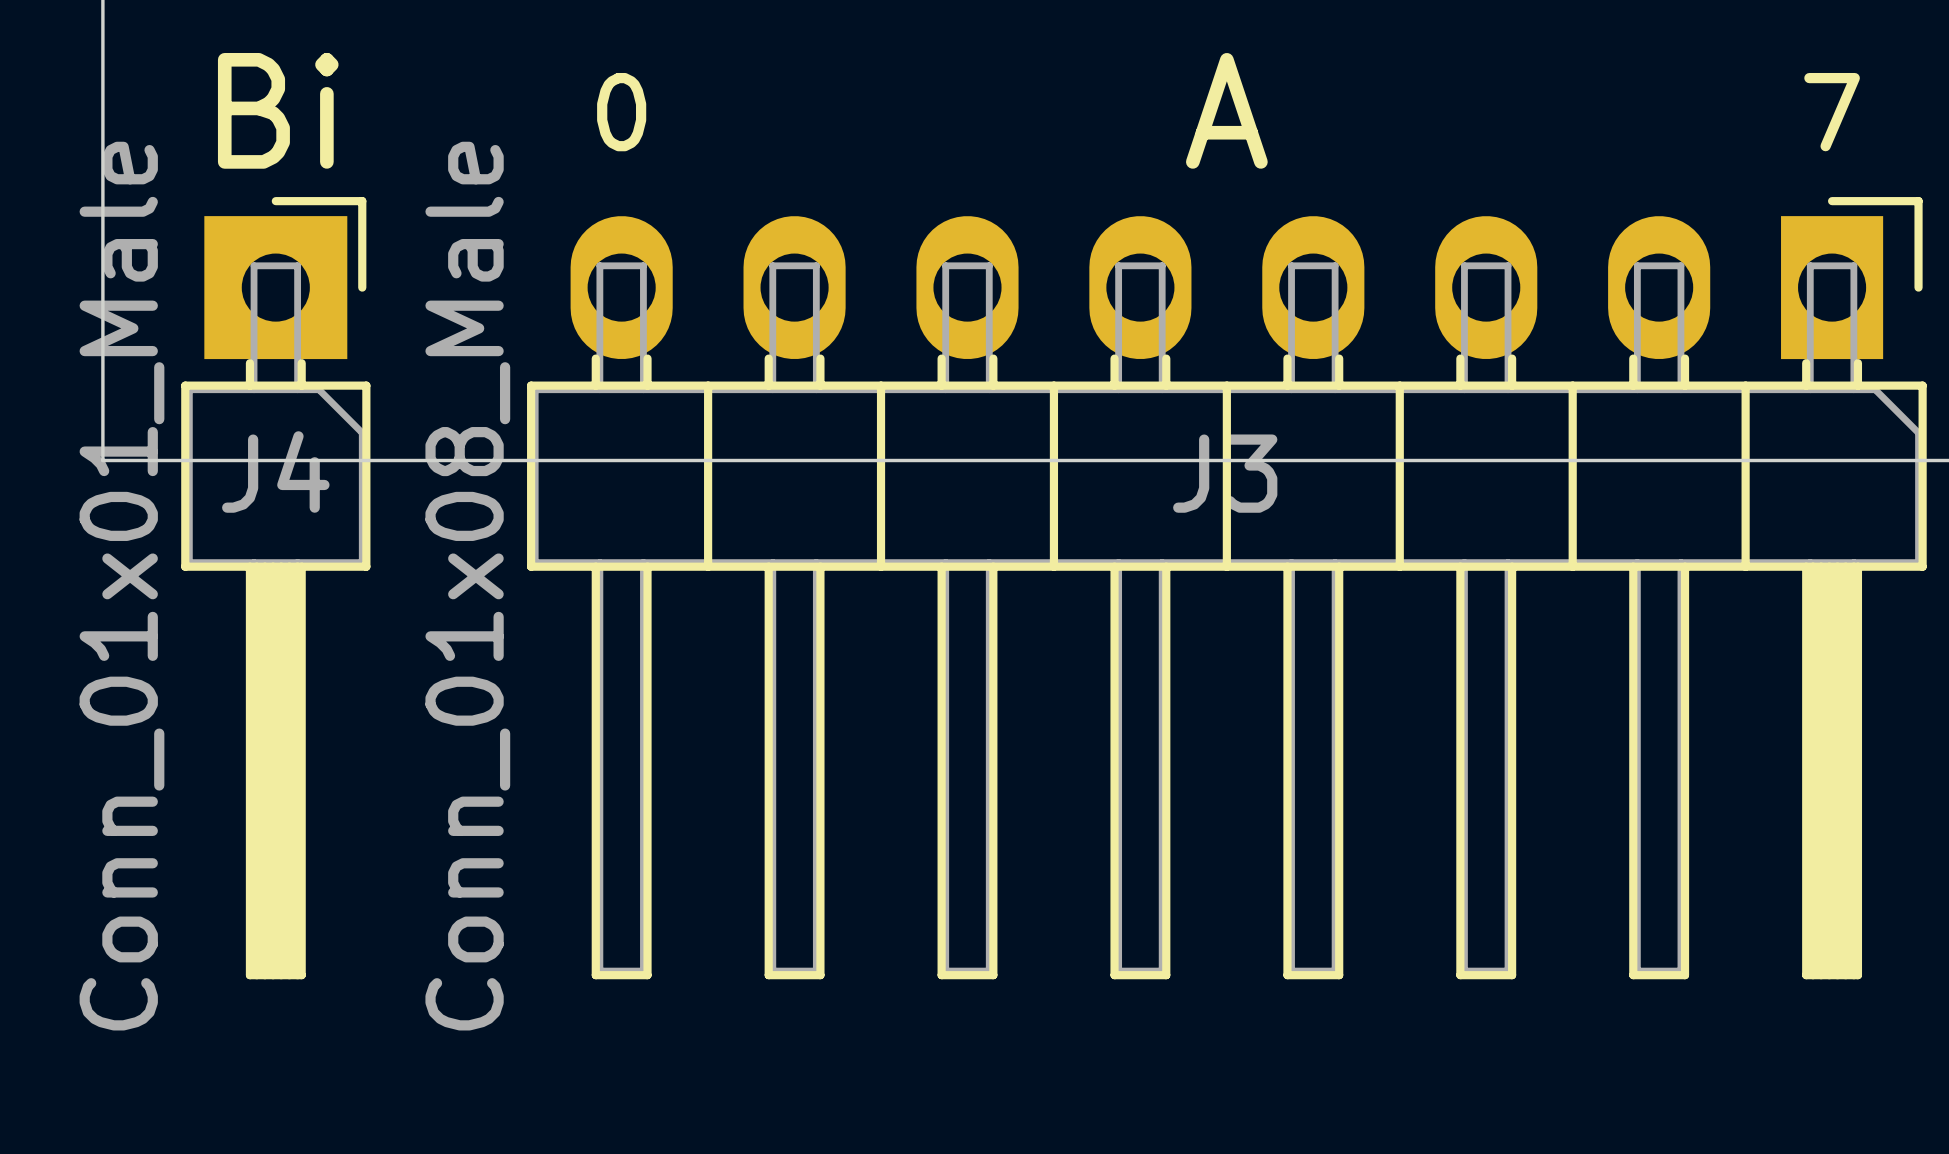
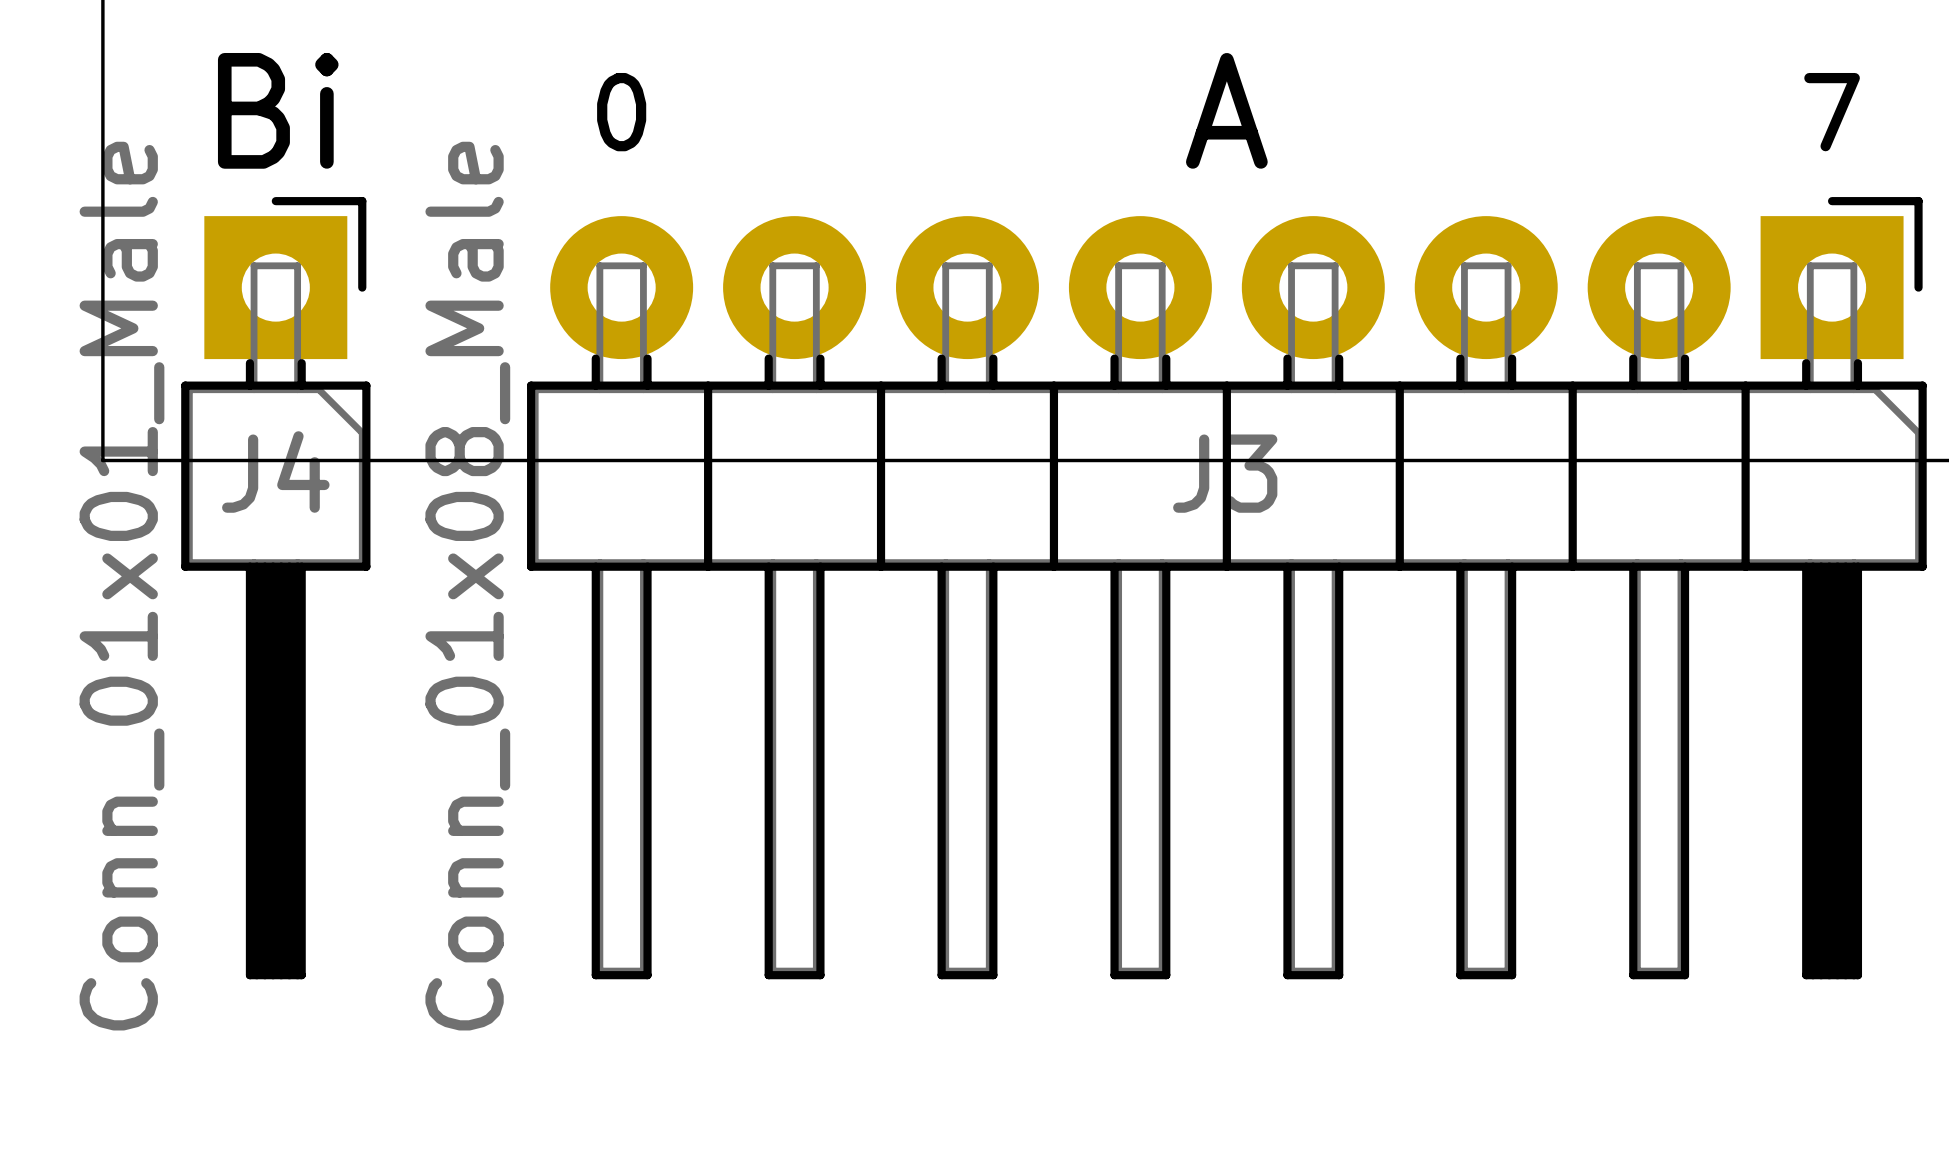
J3 footprint: [527, 197, 1927, 980] -> [527, 197, 1927, 980]

